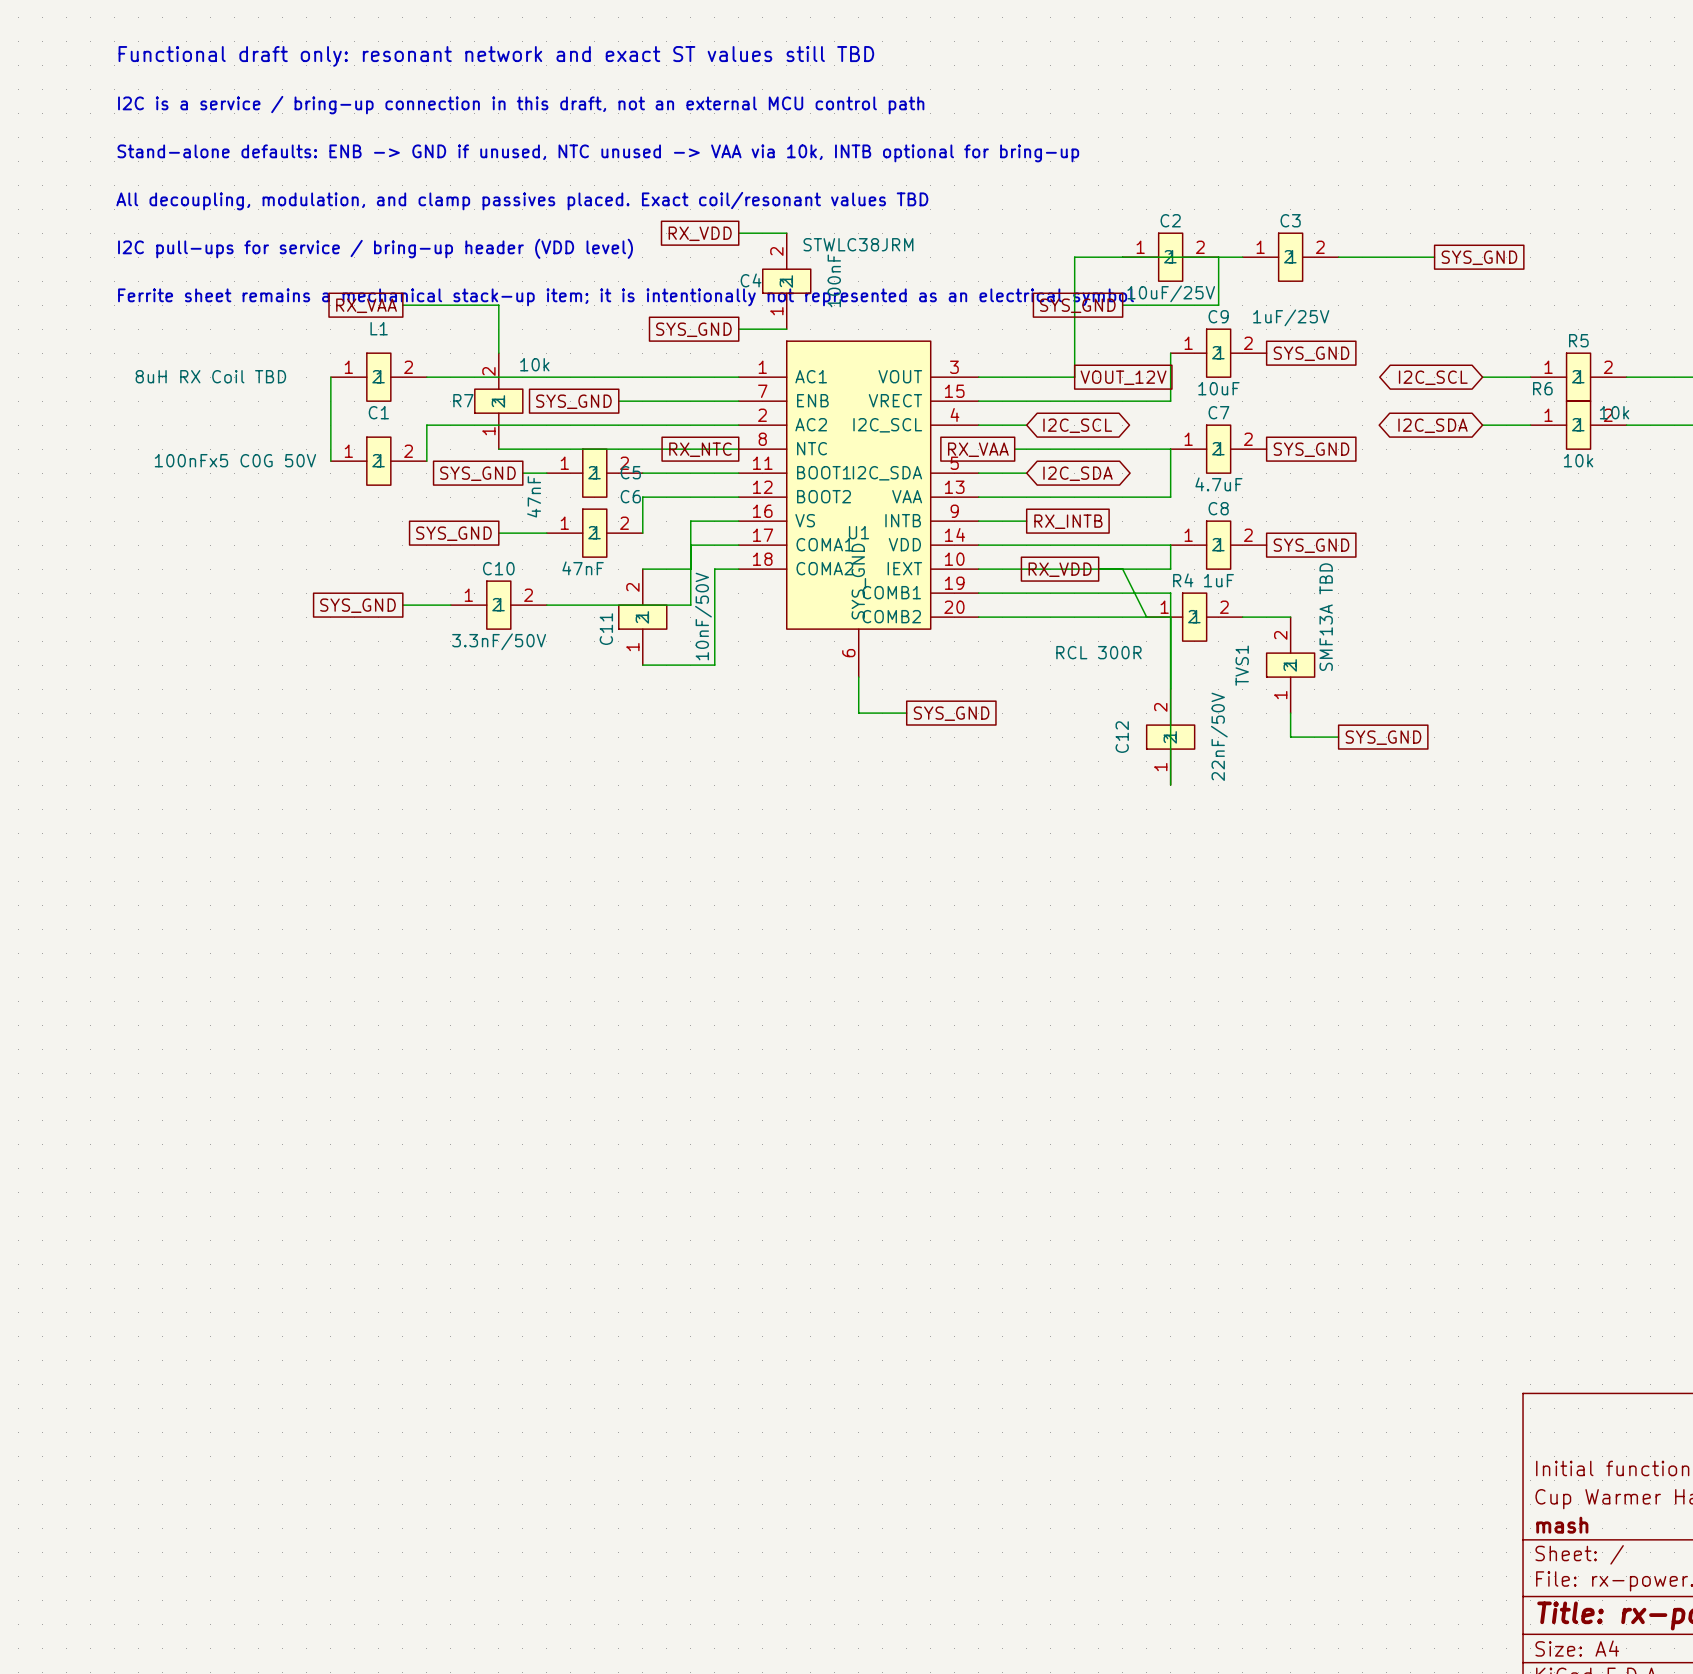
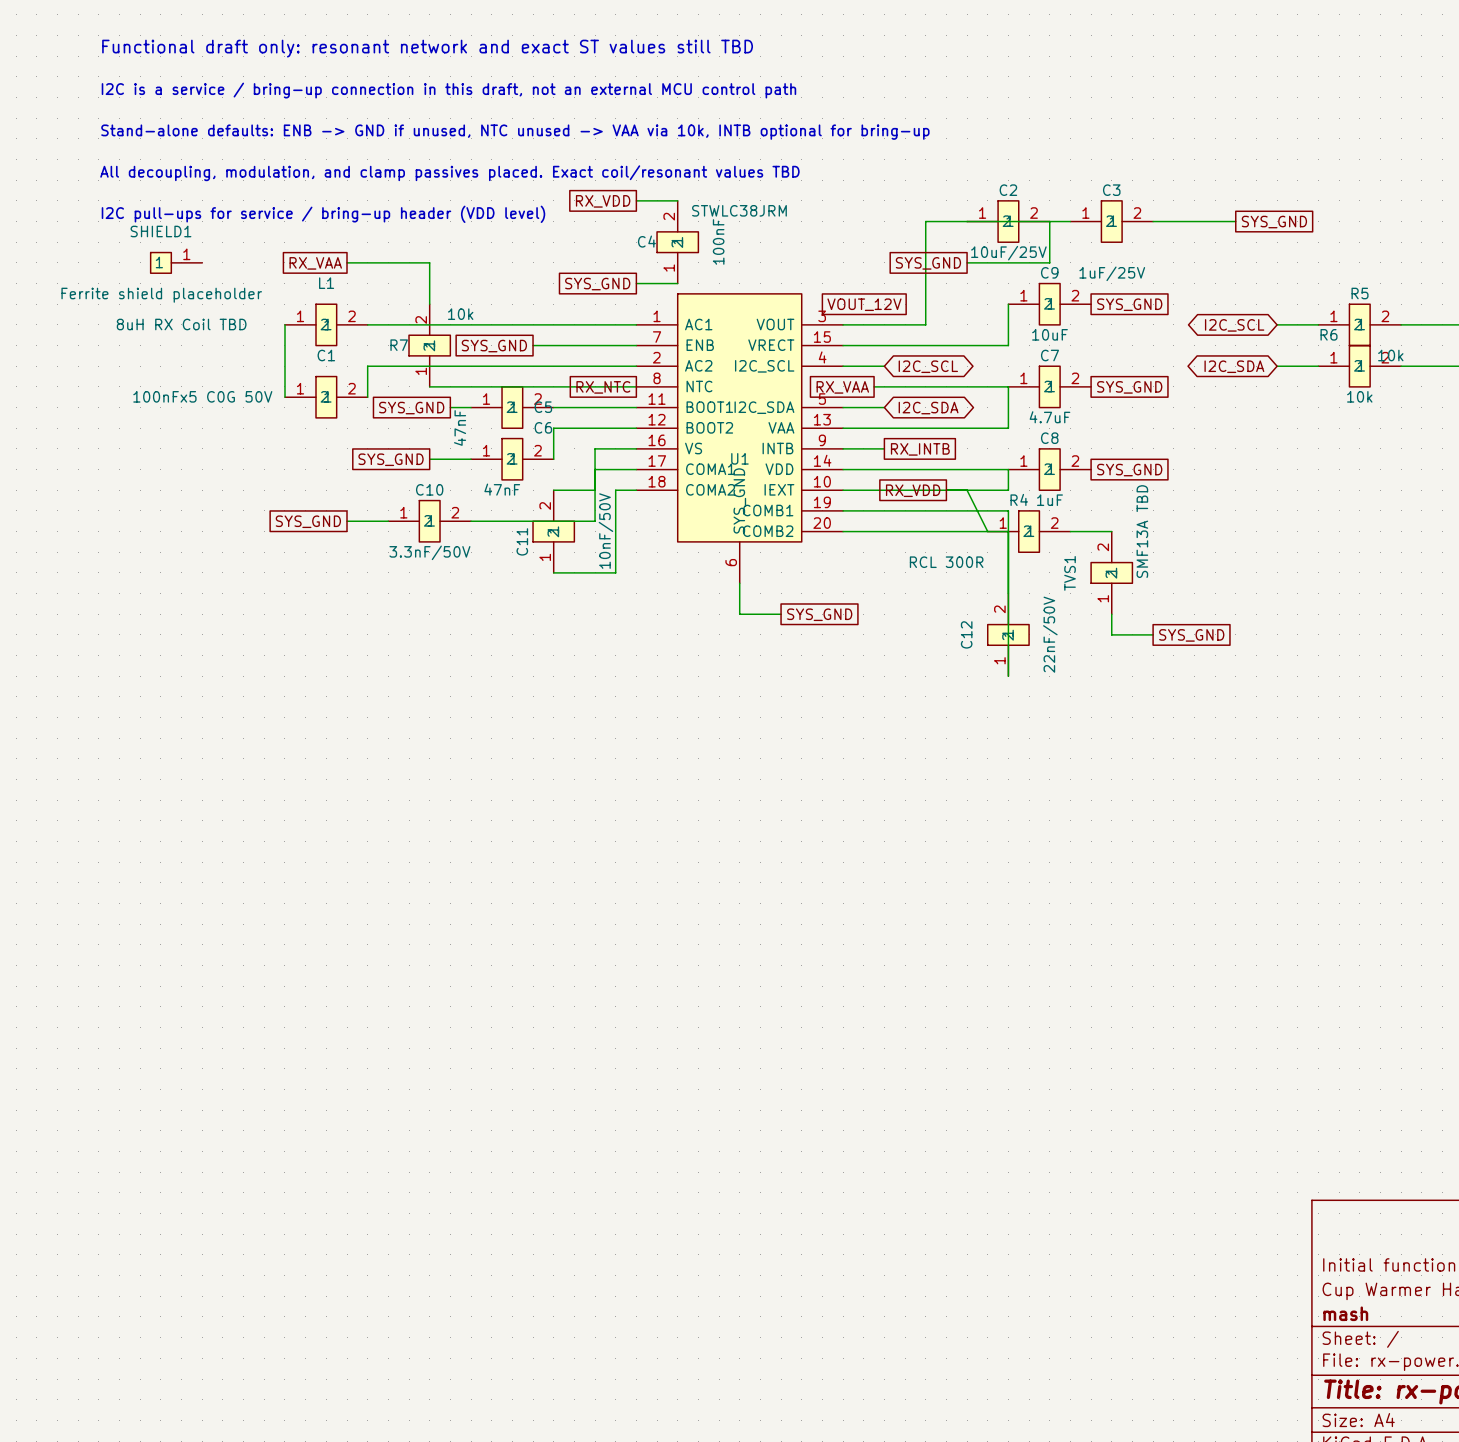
text: Ferrite sheet remains a mechanical stack-up item; it is intentionally not represented as an electrical symbol (626, 297) -> none
SHIELD1: none -> Ferrite shield placeholder (176, 262)
global label position: VOUT_12V (1123, 377) -> VOUT_12V (864, 304)

